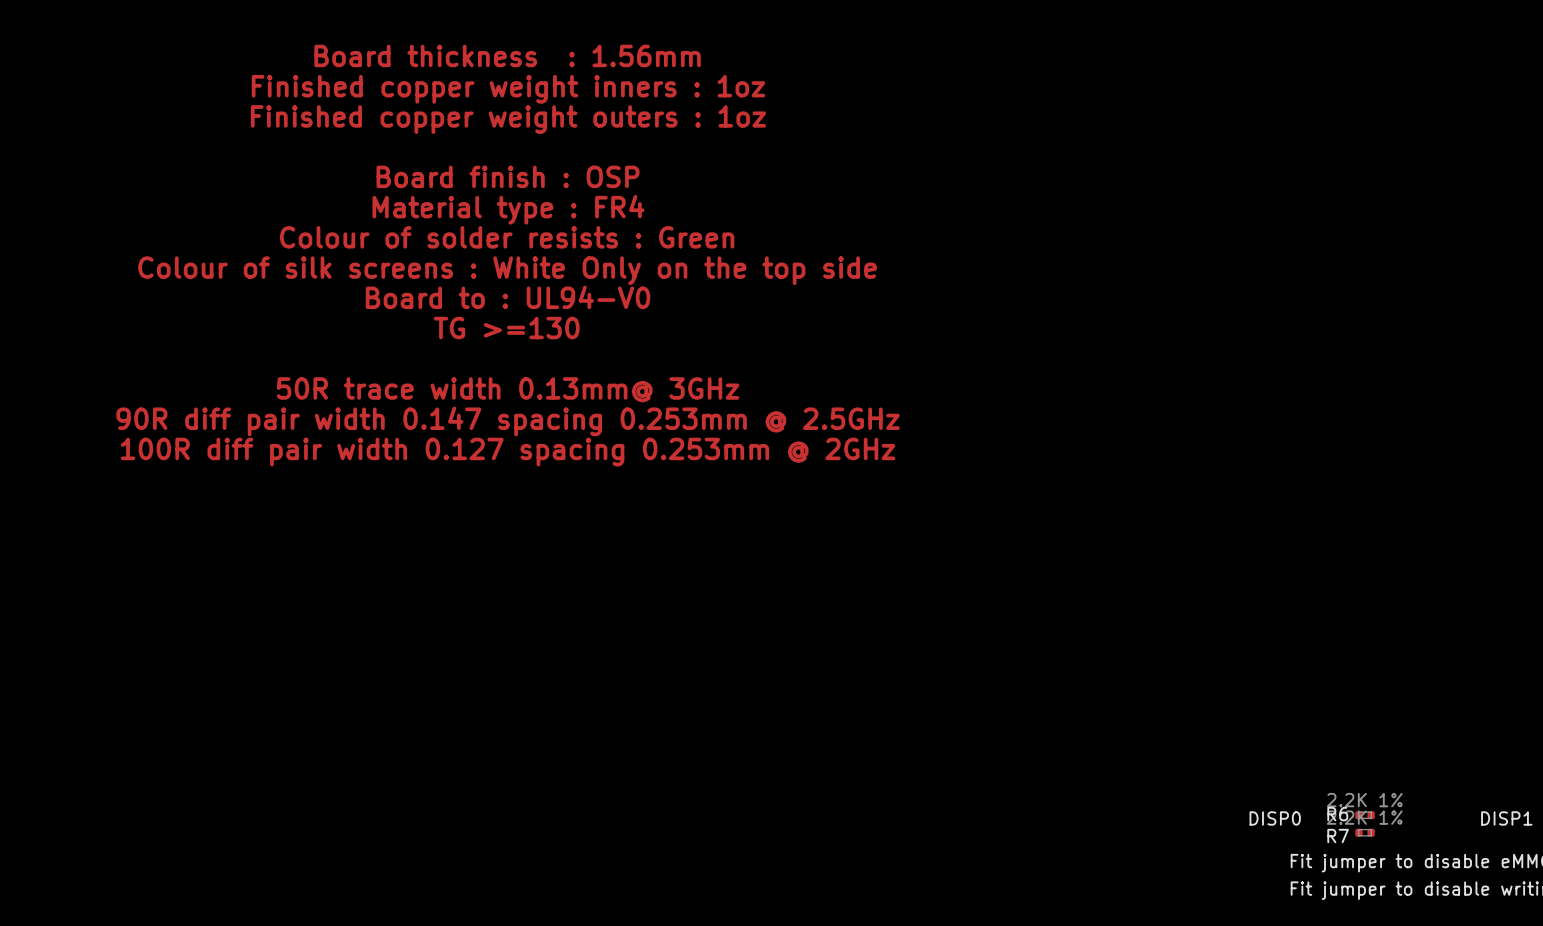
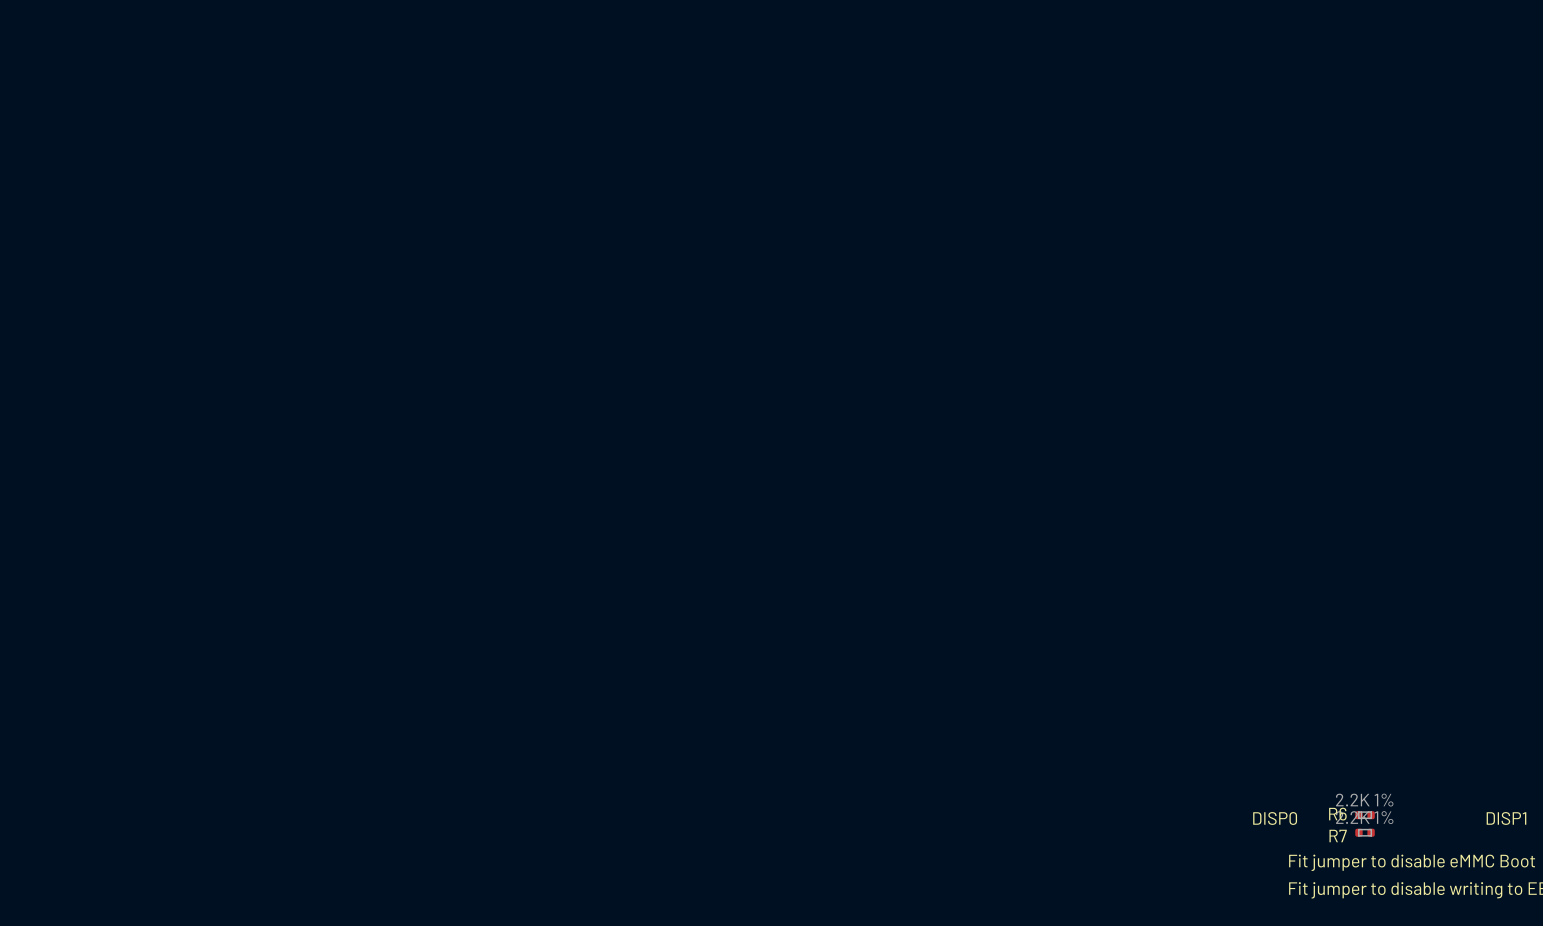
text: Board thickness : 1.56mm (507, 55) -> none
text: Finished copper weight inners : 1oz (508, 89) -> none
text: Finished copper weight outers : 1oz (508, 119) -> none
text: Board finish : OSP (508, 176) -> none
text: Material type : FR4 (508, 209) -> none
text: Colour of solder resists : Green (507, 237) -> none
text: Colour of silk screens : White Only on the top side (507, 270) -> none
text: Board to : UL94-V0 (508, 297) -> none
text: TG >=130 (506, 328) -> none
text: 50R trace width 0.13mm@ 3GHz (508, 389) -> none
text: 90R diff pair width 0.147 spacing 0.253mm @ 2.5GHz (508, 421) -> none
text: 100R diff pair width 0.127 spacing 0.253mm @ 2GHz (508, 452) -> none

